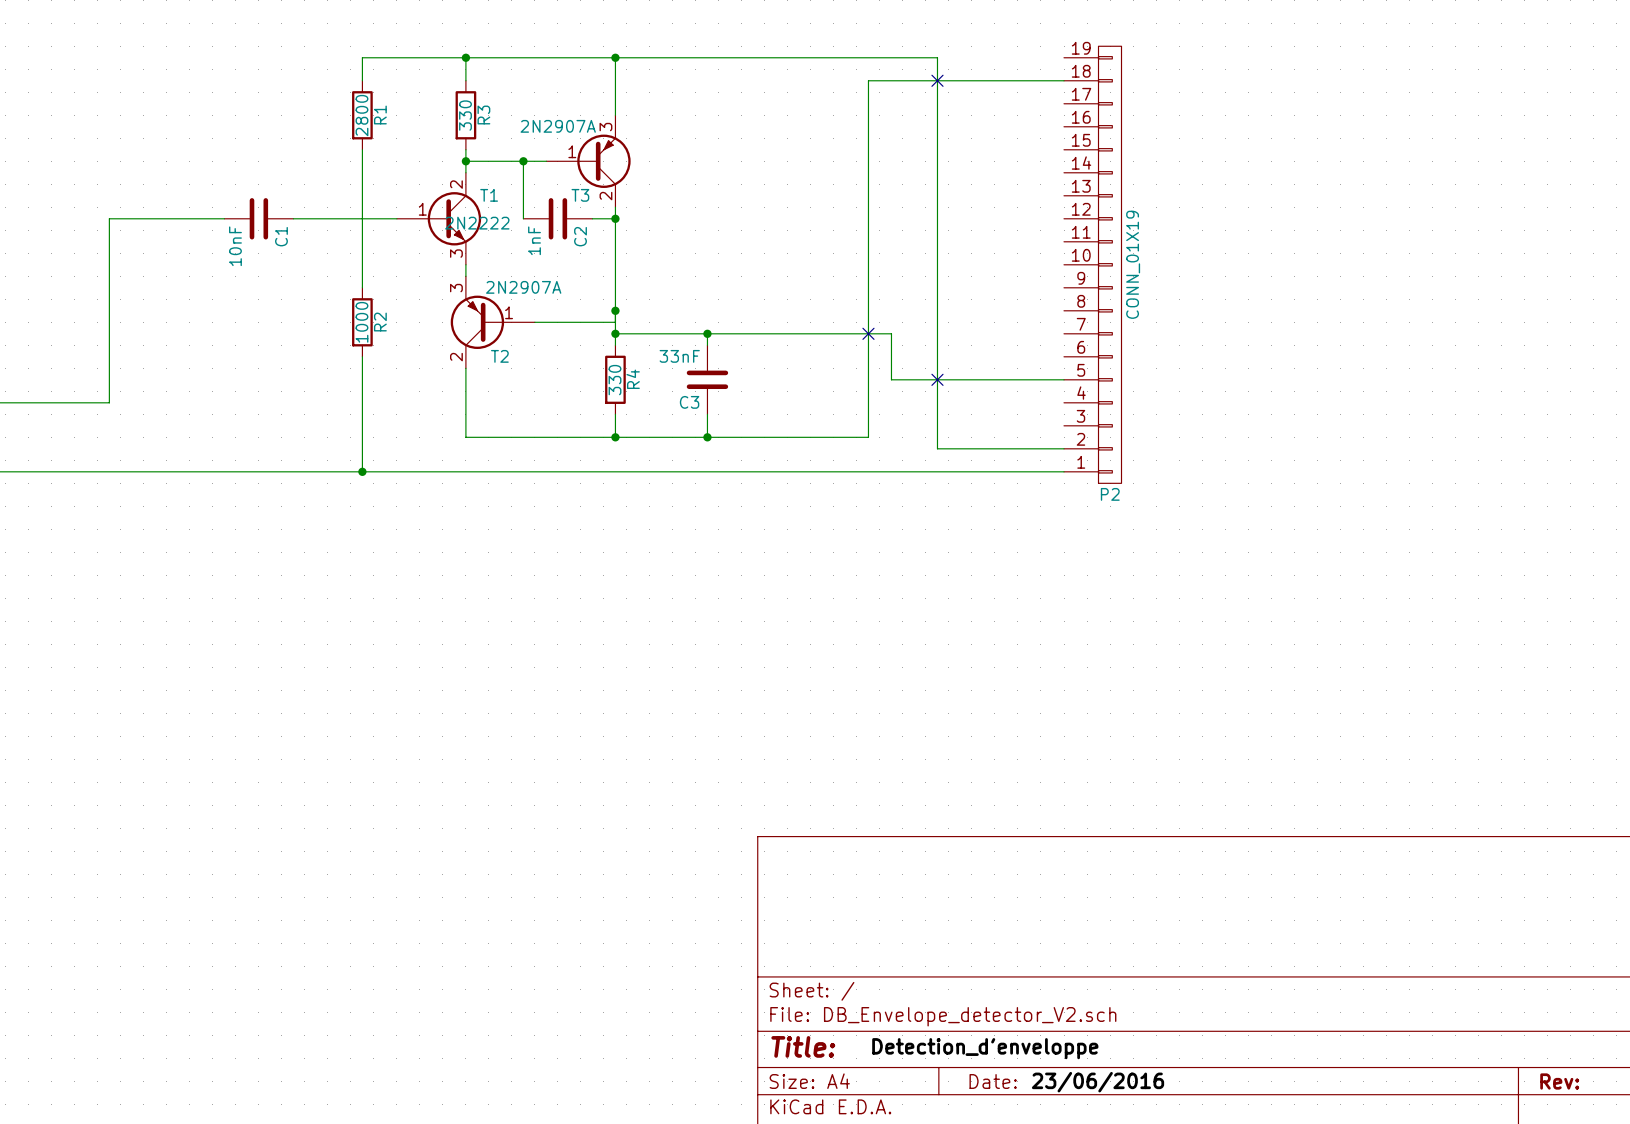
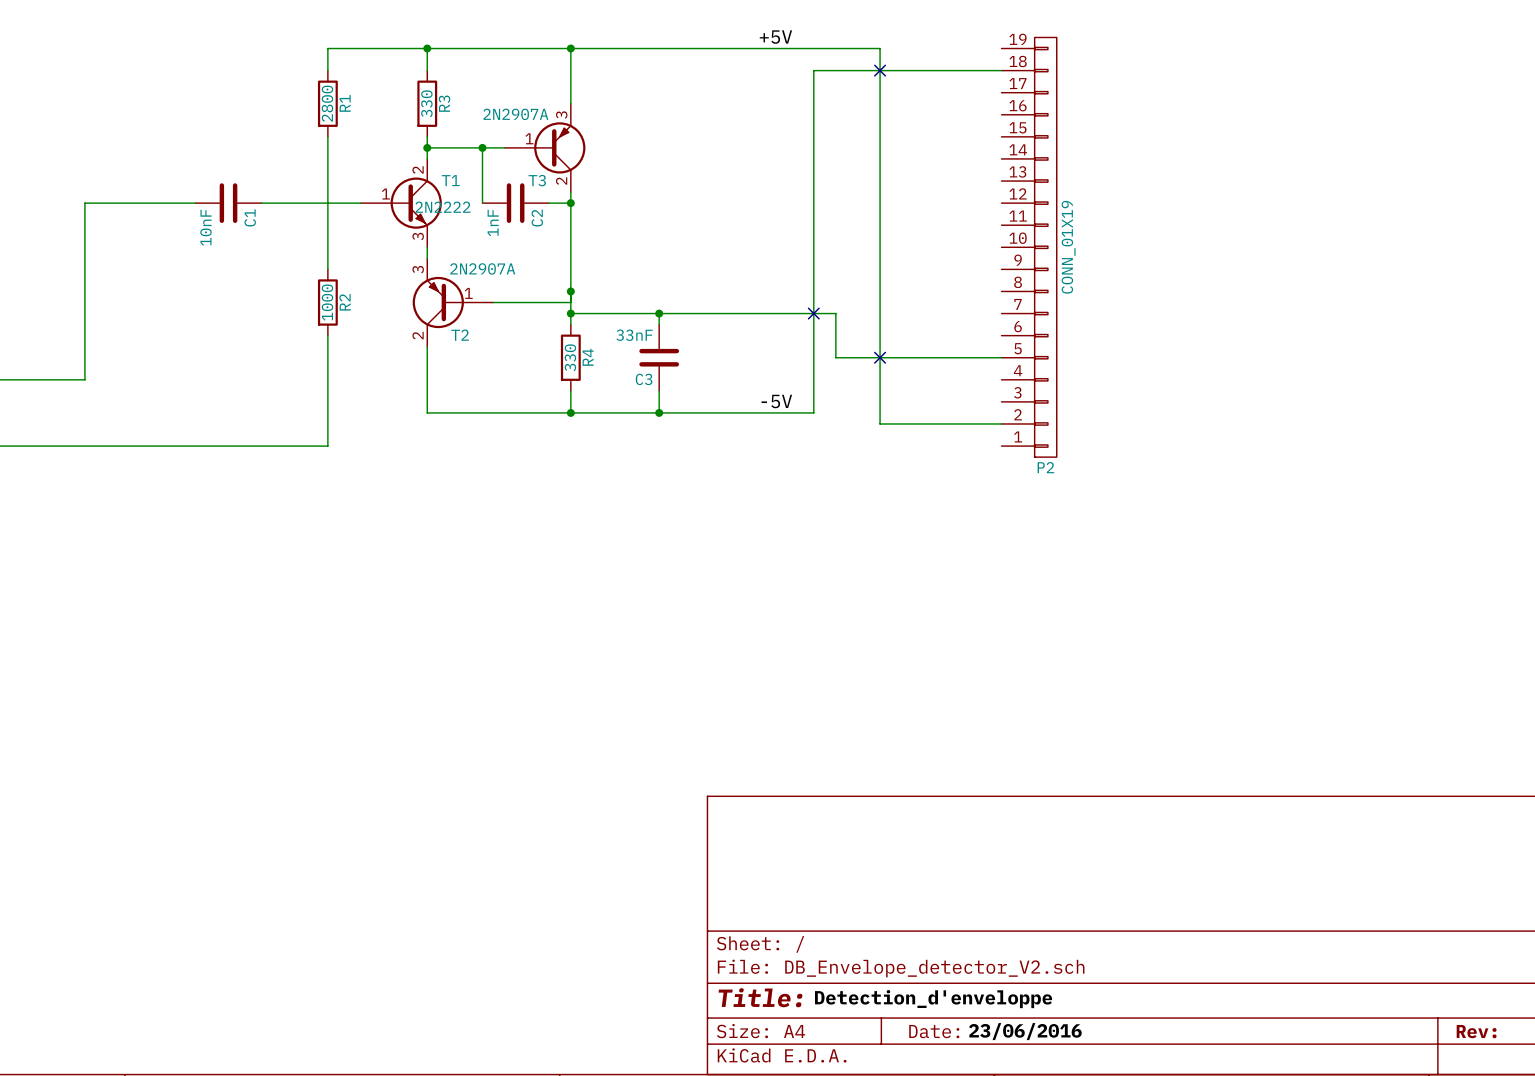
label: none -> +5V (775, 37)
label: none -> -5V (776, 401)
wire: (362, 471) (1064, 471) -> none
junction: (362, 471) -> none

